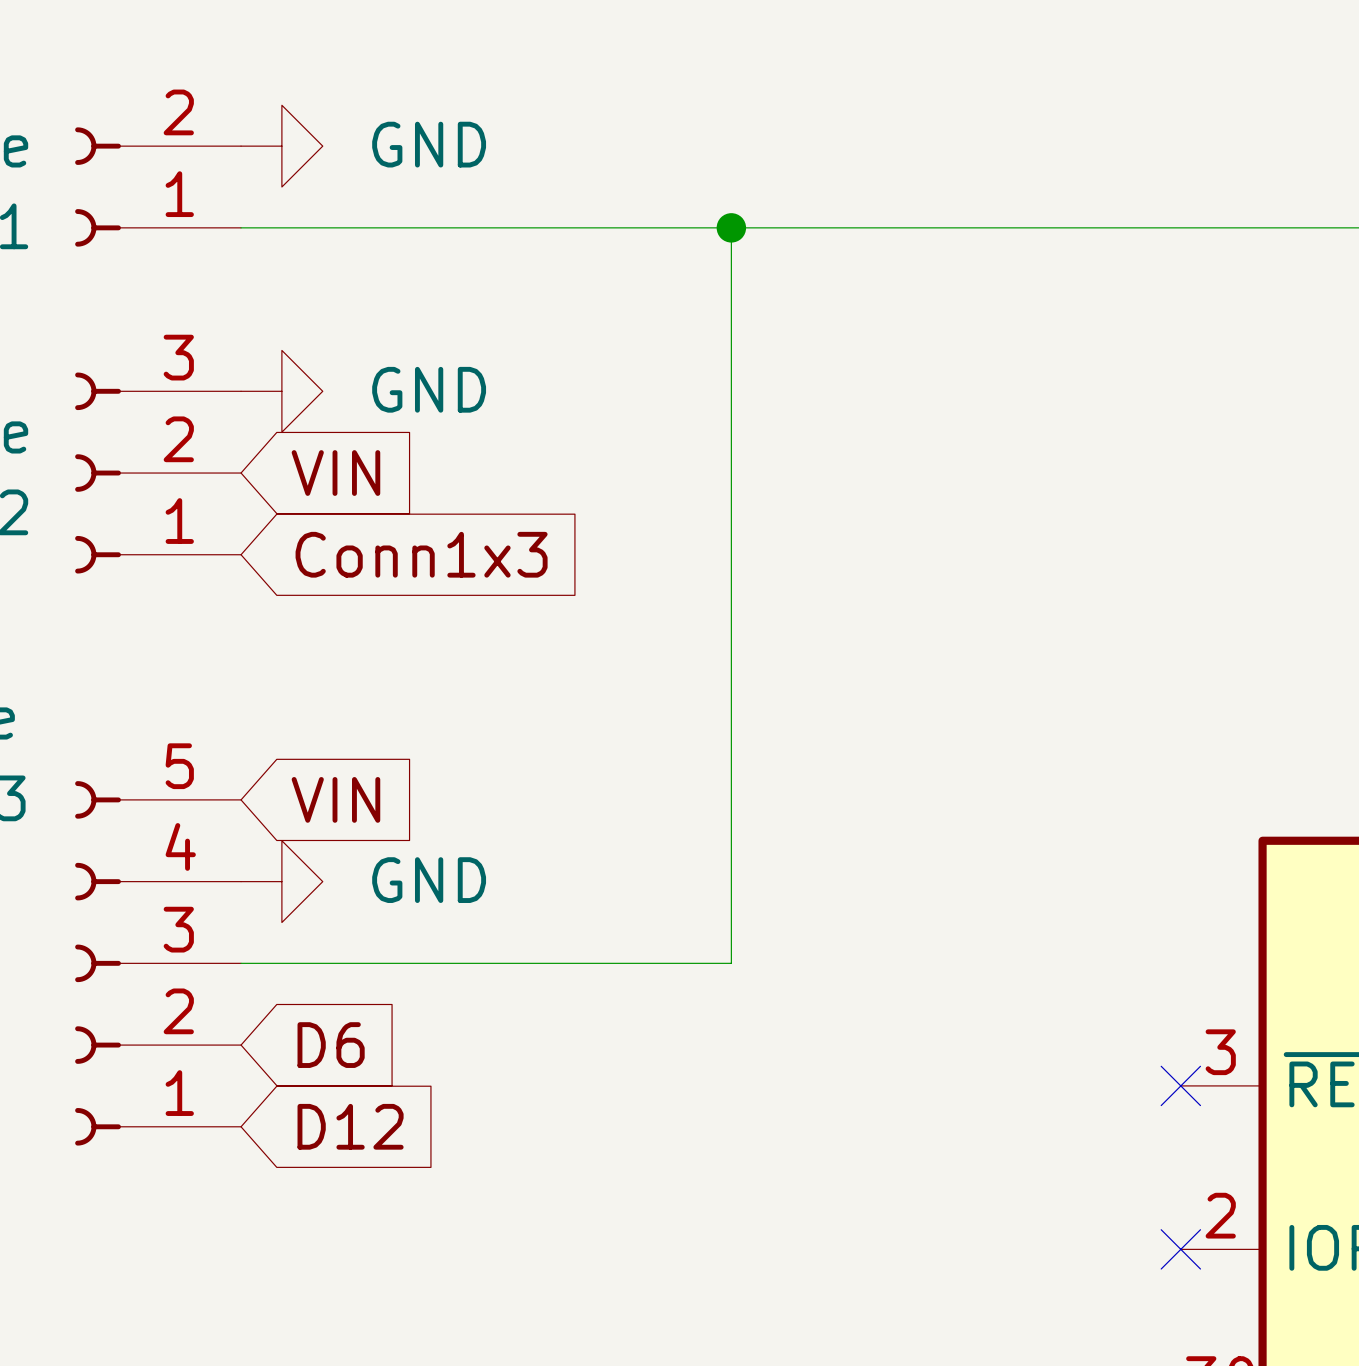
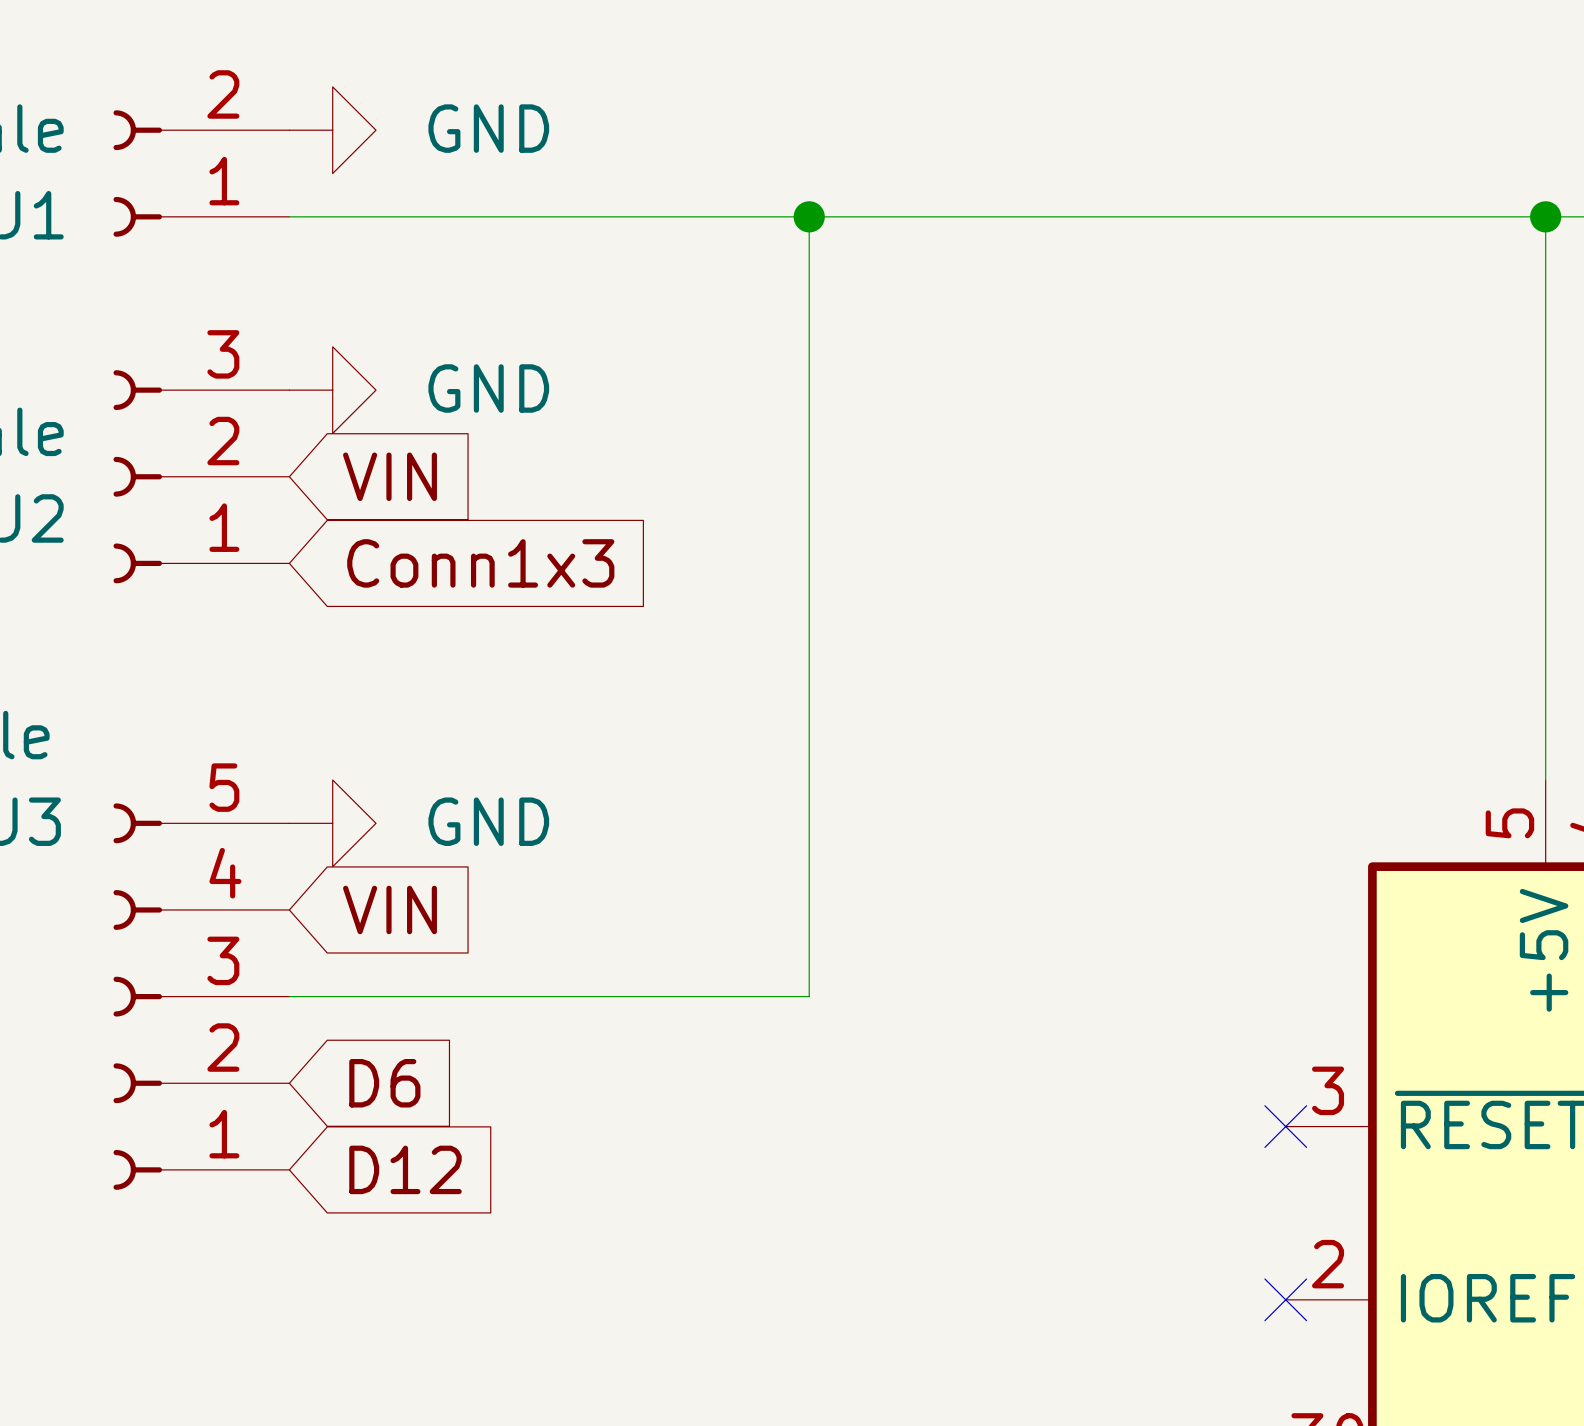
global label position: VIN (335, 799) -> VIN (390, 909)
power symbol position: GND (281, 881) -> GND (332, 823)

